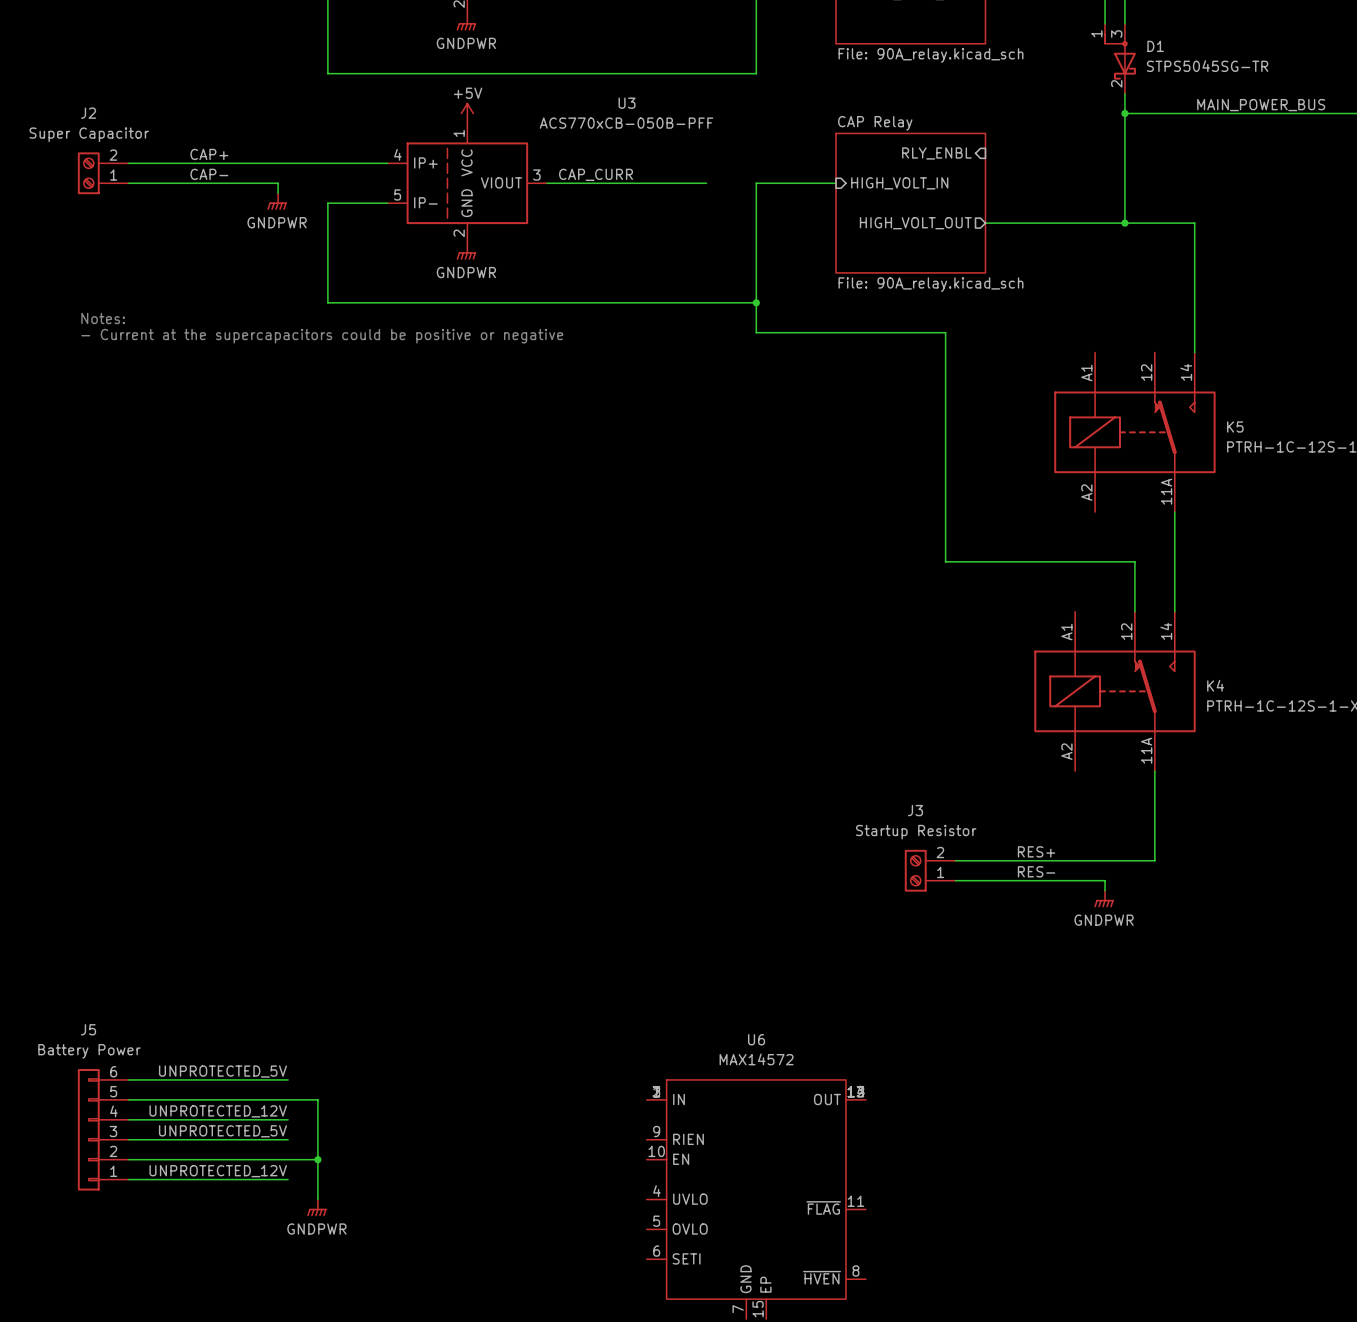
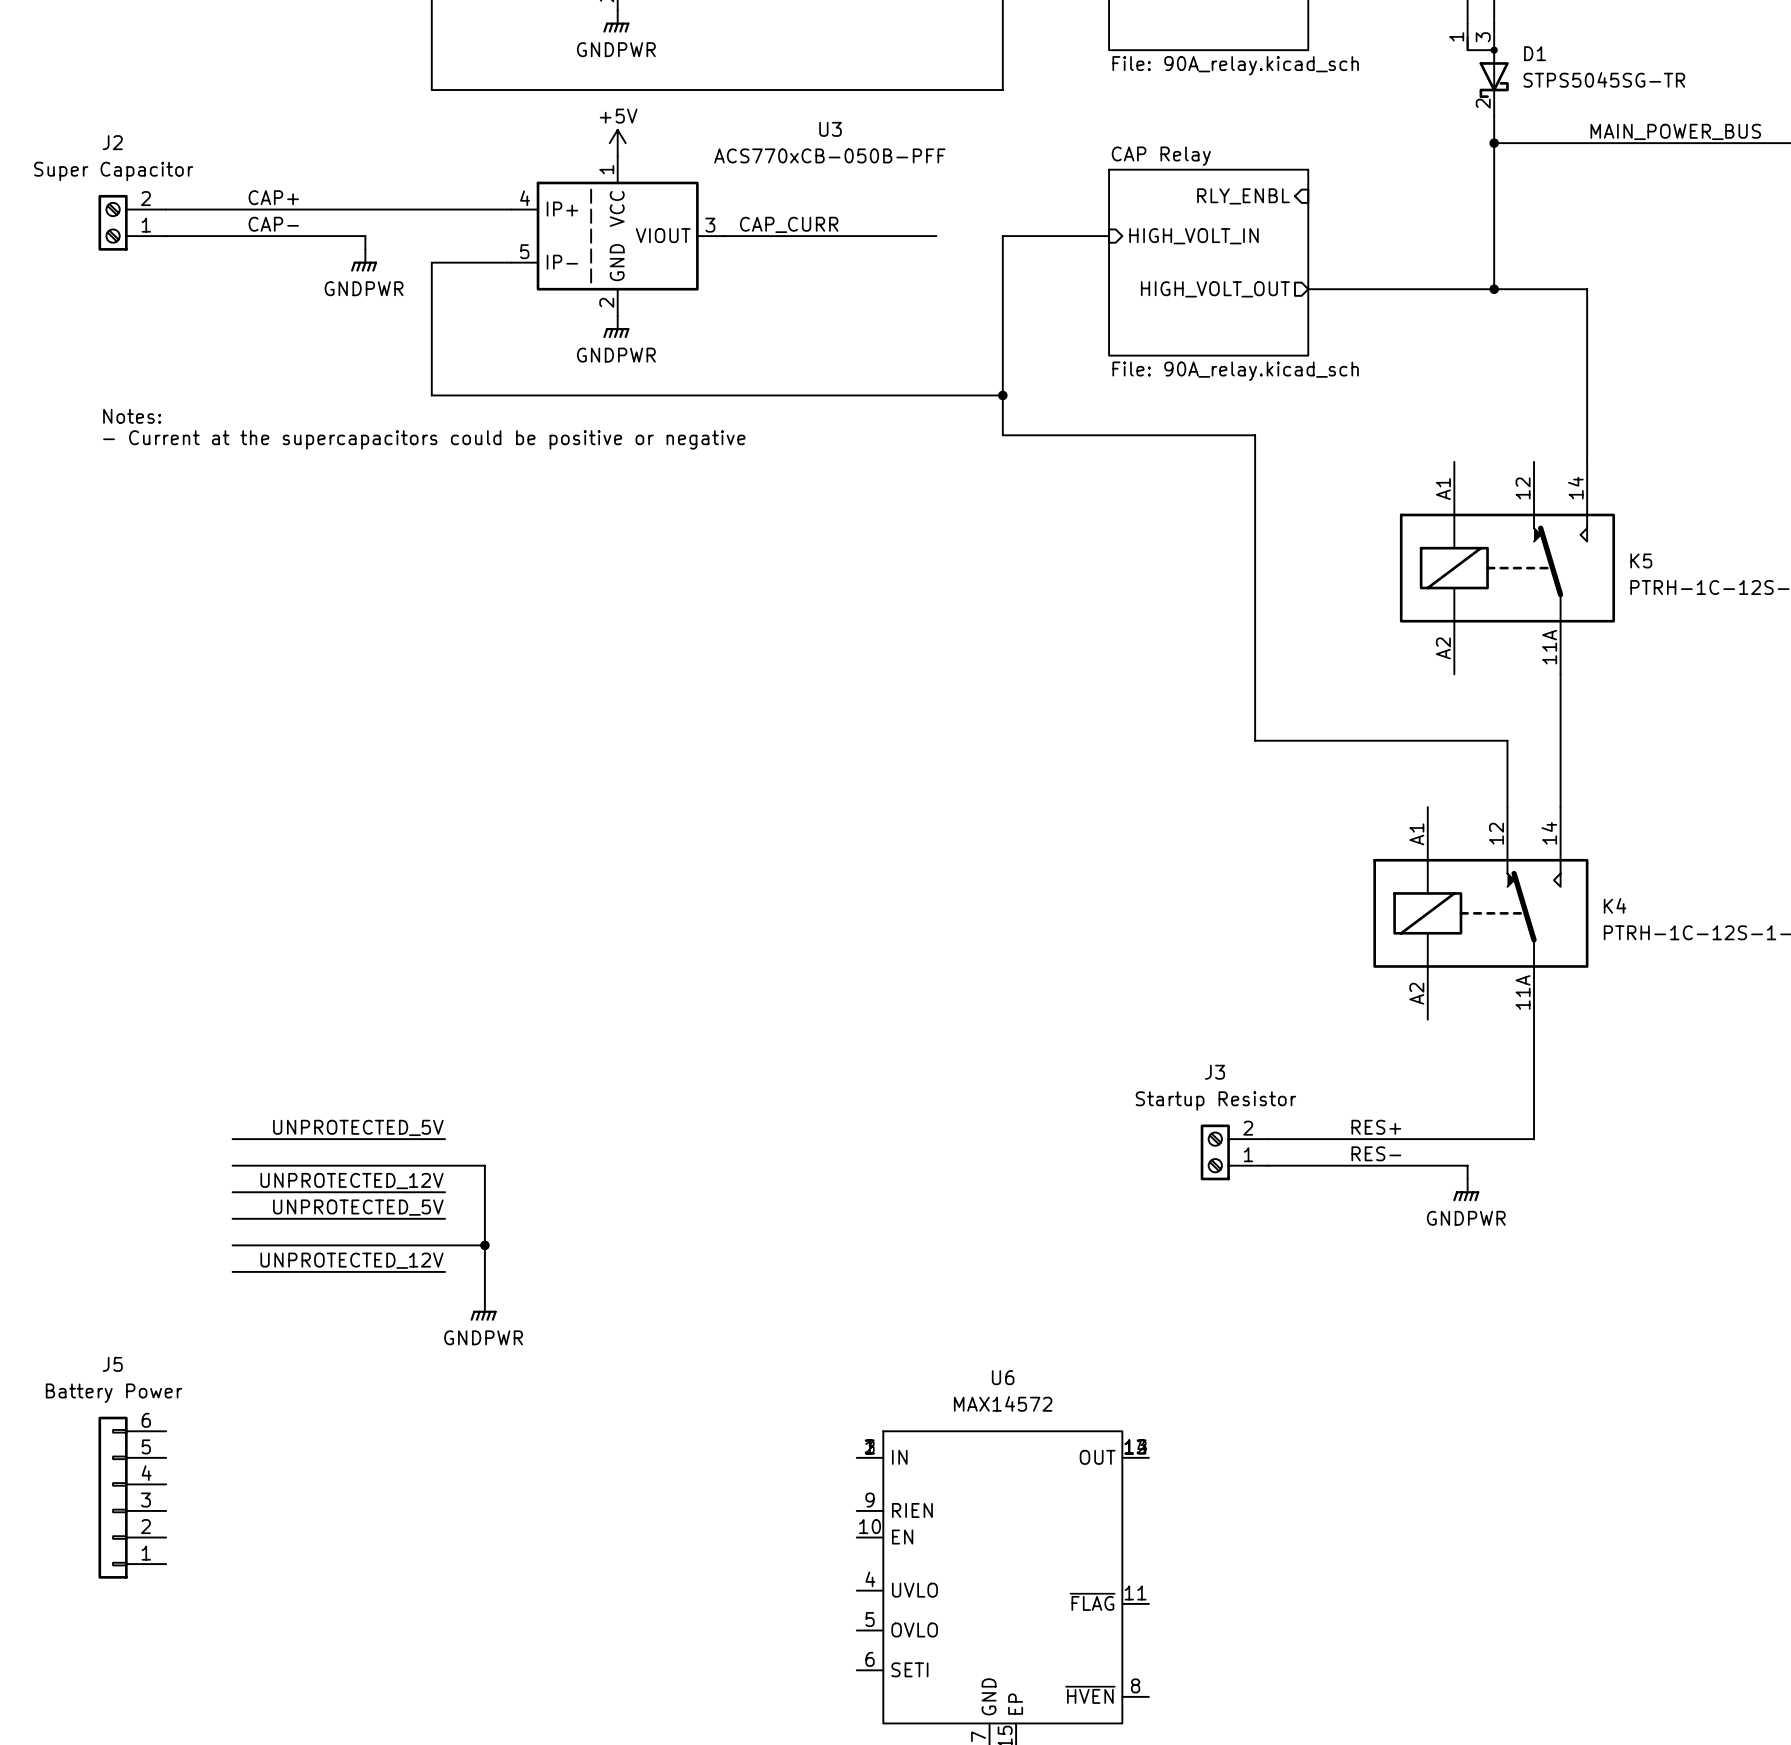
label: none -> UNPROTECTED_5V (358, 1127)
wire: none -> (232, 1139) (445, 1139)
wire: none -> (232, 1165) (484, 1165) (484, 1298)
label: none -> UNPROTECTED_12V (352, 1181)
wire: none -> (232, 1192) (445, 1192)
label: none -> UNPROTECTED_5V (358, 1207)
wire: none -> (232, 1245) (484, 1245)
junction: none -> (484, 1245)
label: none -> UNPROTECTED_12V (352, 1260)
power symbol: none -> GNDPWR (483, 1309)
label: UNPROTECTED_5V (222, 1071) -> none
wire: (128, 1079) (288, 1079) -> (232, 1218) (445, 1218)
wire: (128, 1099) (317, 1099) (317, 1199) -> none
label: UNPROTECTED_12V (218, 1111) -> none
wire: (128, 1119) (288, 1119) -> (232, 1271) (445, 1271)
label: UNPROTECTED_5V (222, 1131) -> none
wire: (128, 1139) (288, 1139) -> none
wire: (128, 1159) (317, 1159) -> none
junction: (317, 1159) -> none
label: UNPROTECTED_12V (218, 1171) -> none
wire: (128, 1179) (288, 1179) -> none
power symbol: GNDPWR (316, 1207) -> none

